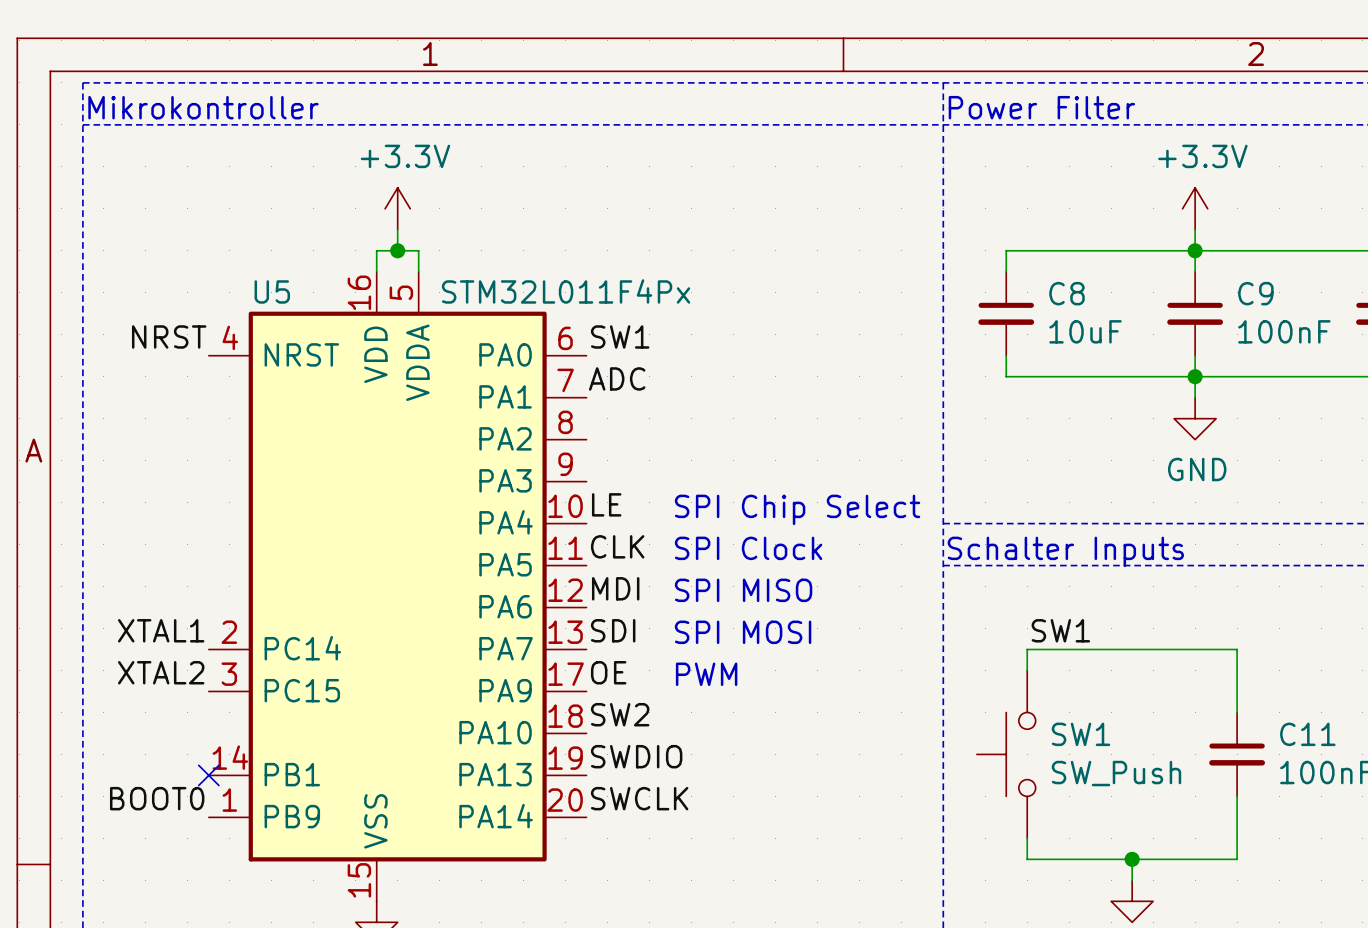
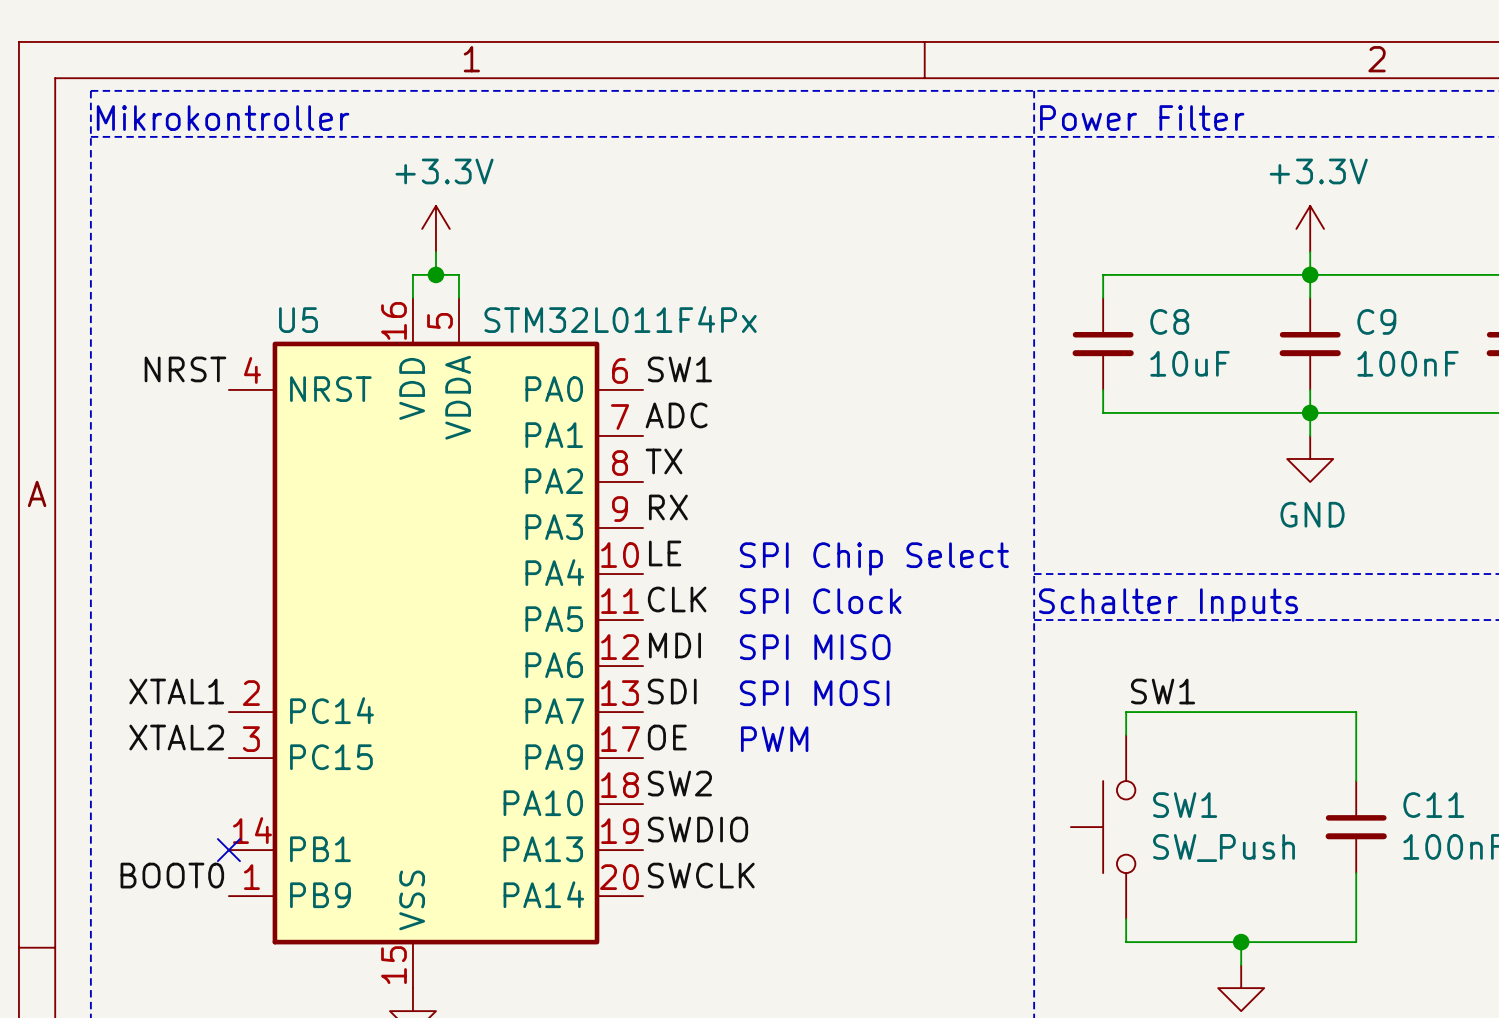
label: none -> TX (664, 461)
label: none -> RX (668, 507)

